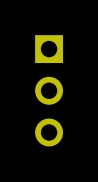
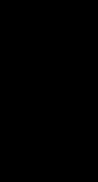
part: (49, 90) -> none

